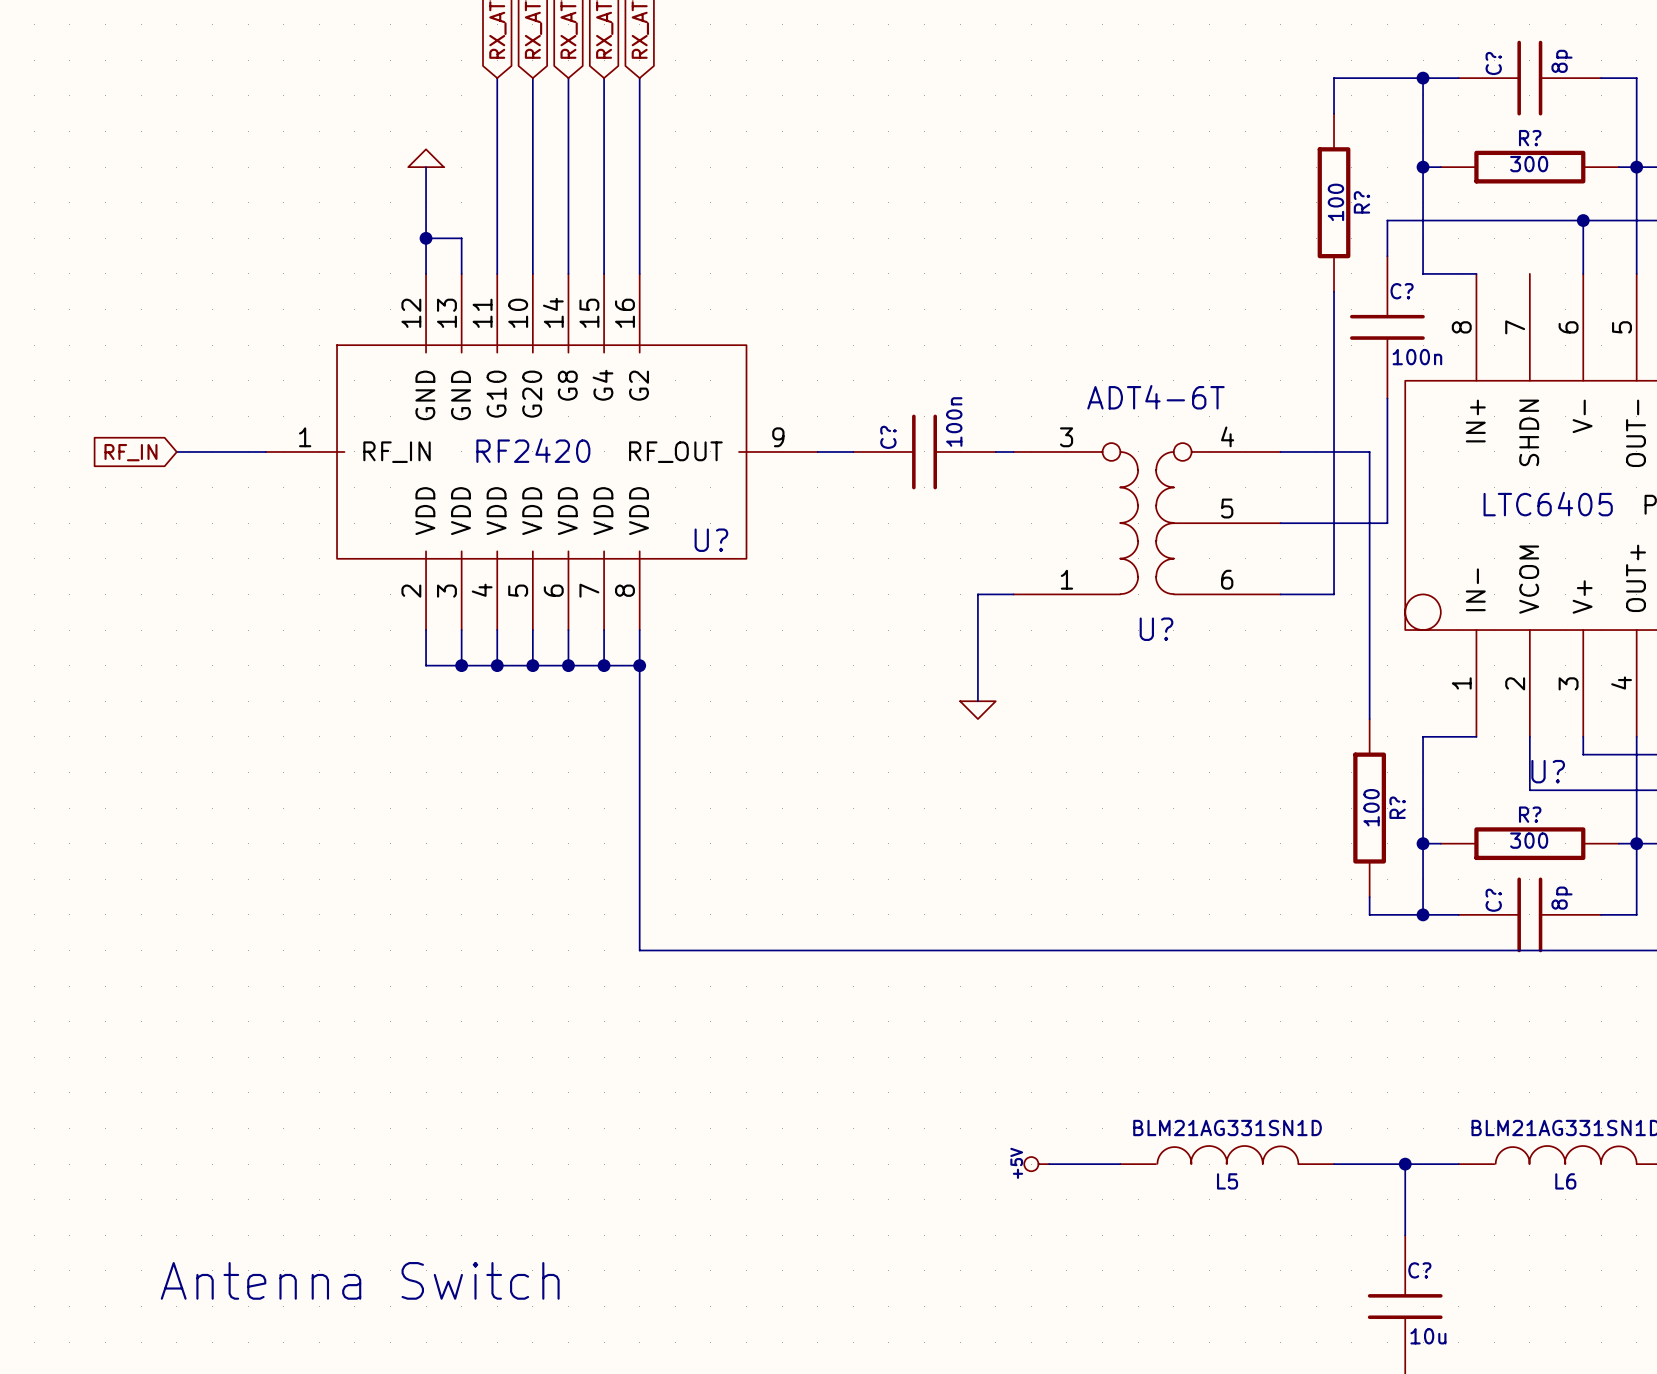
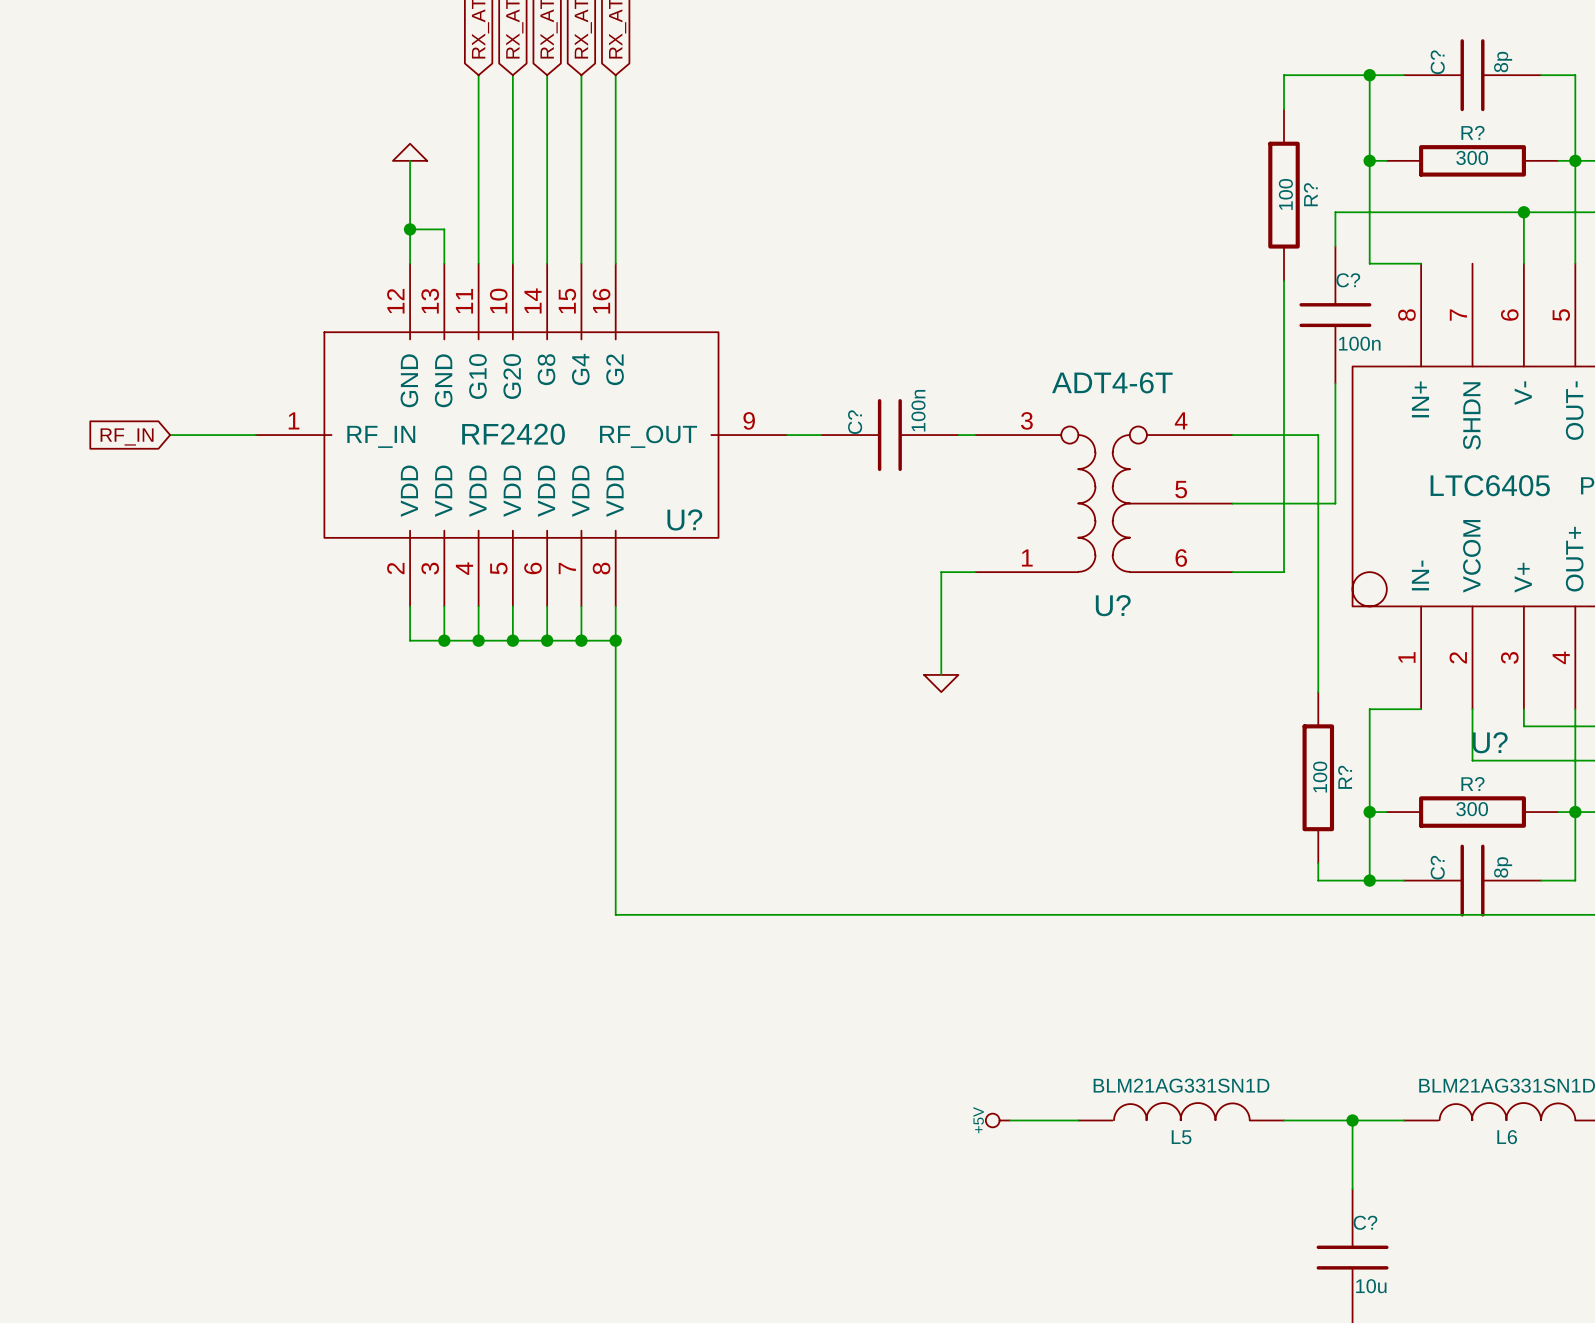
text: Antenna Switch (360, 1280) -> none

